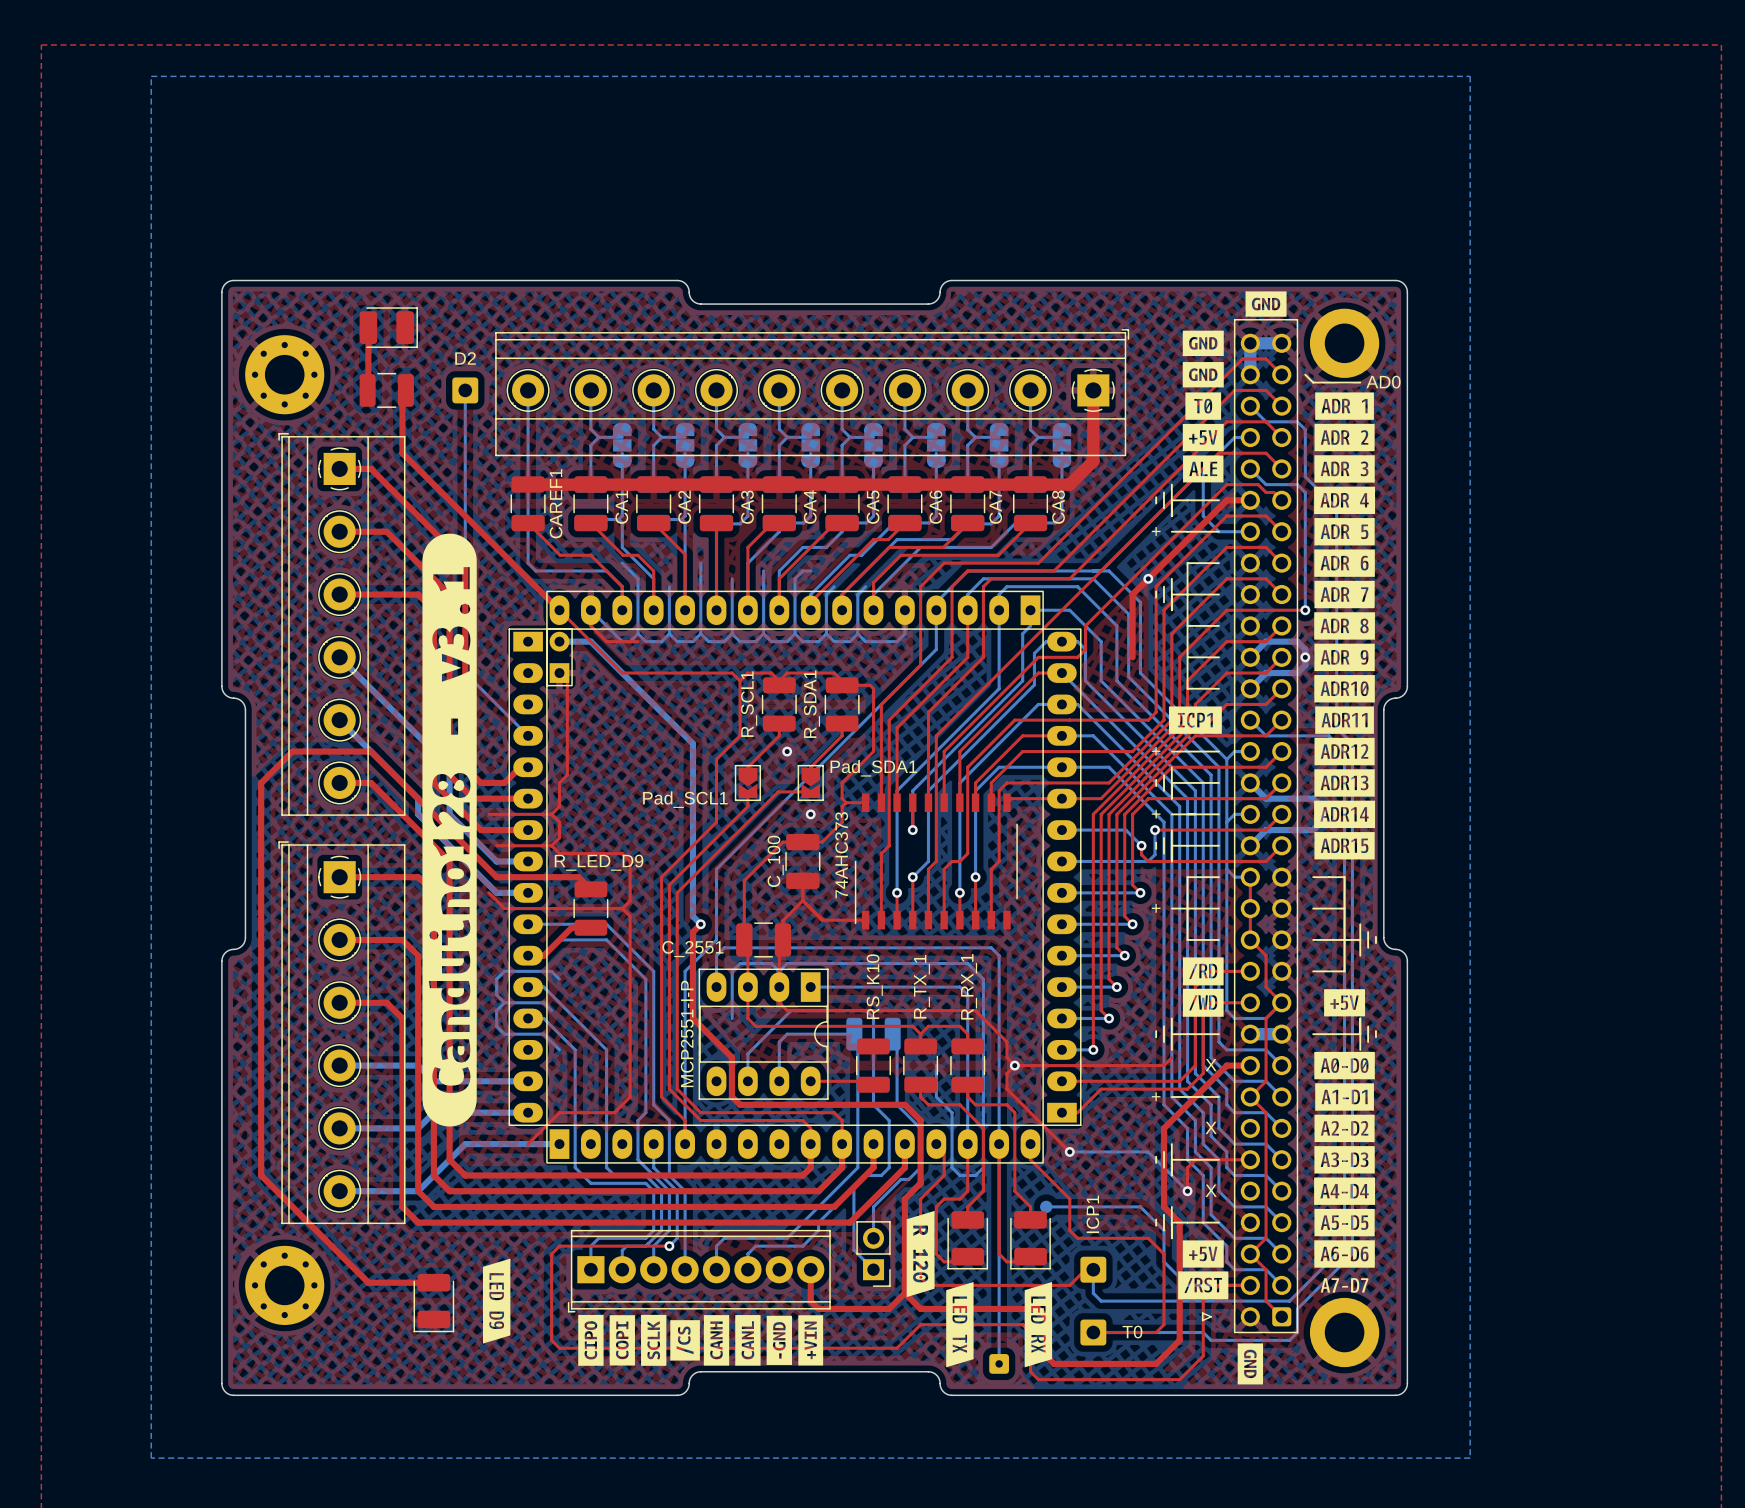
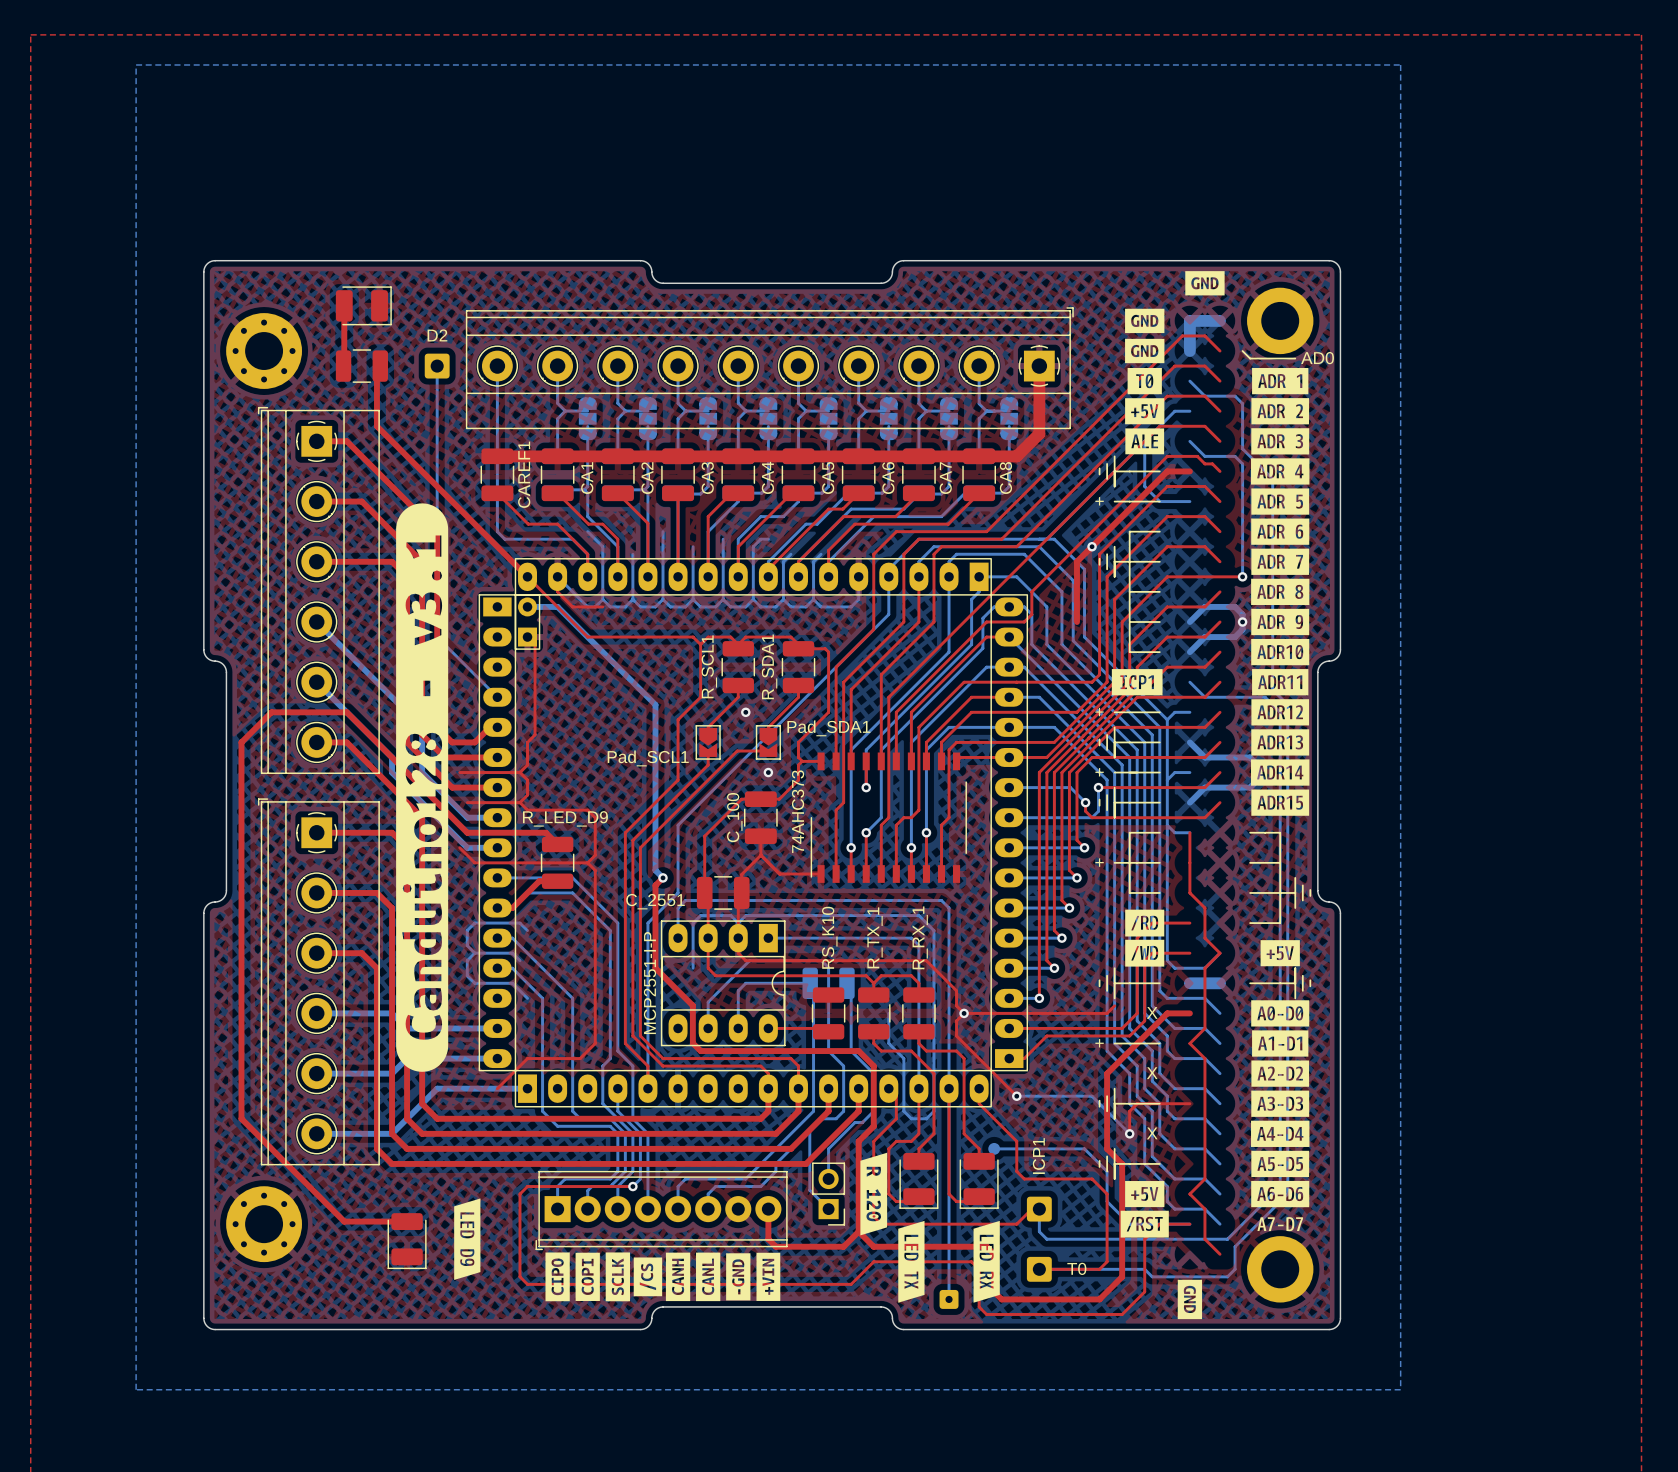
part: (1250, 826) -> none

